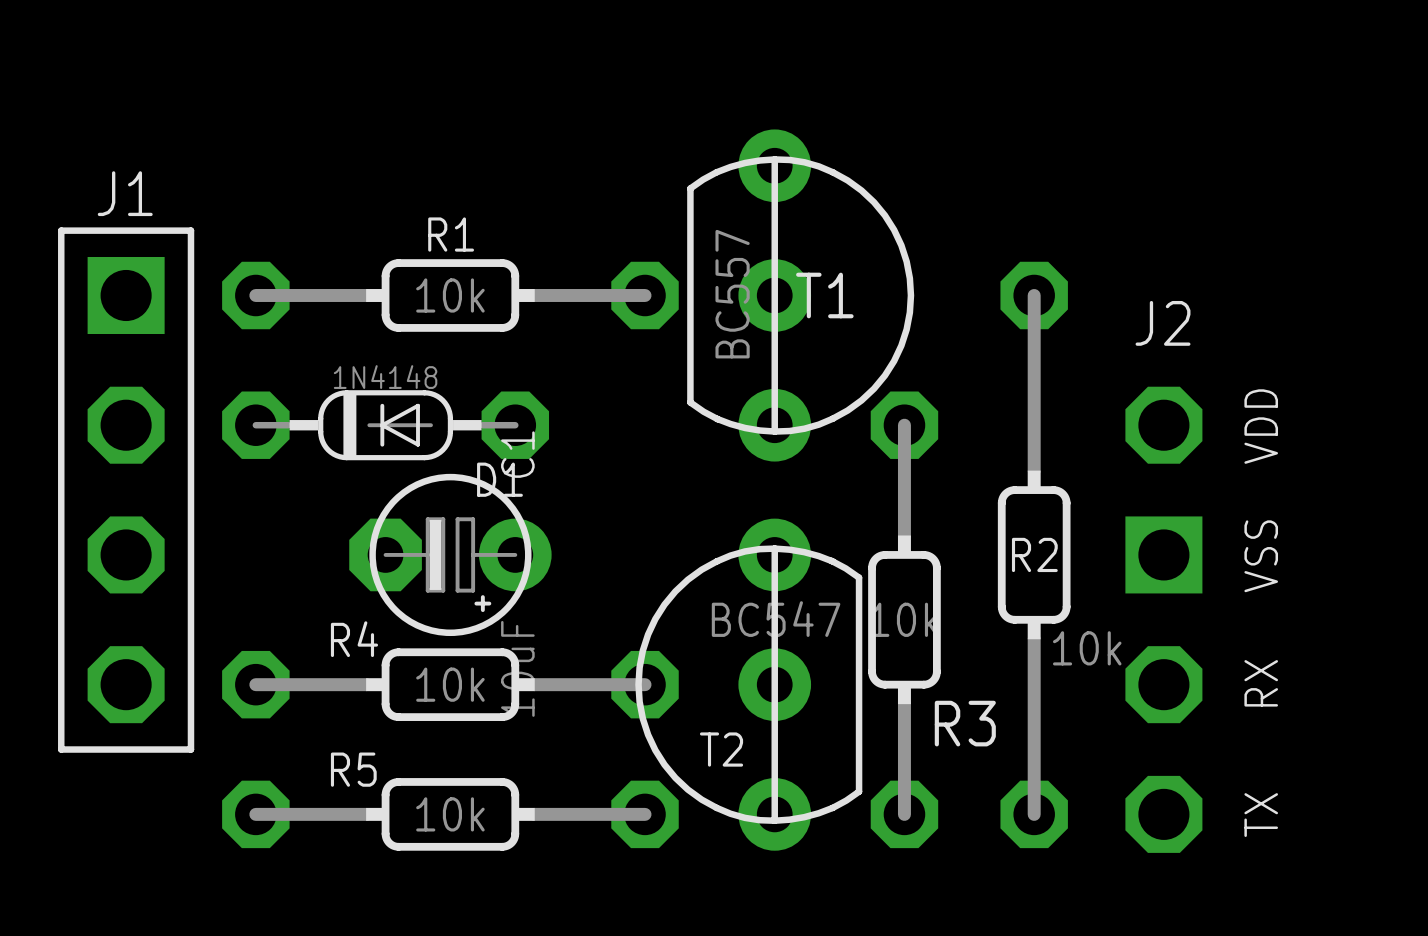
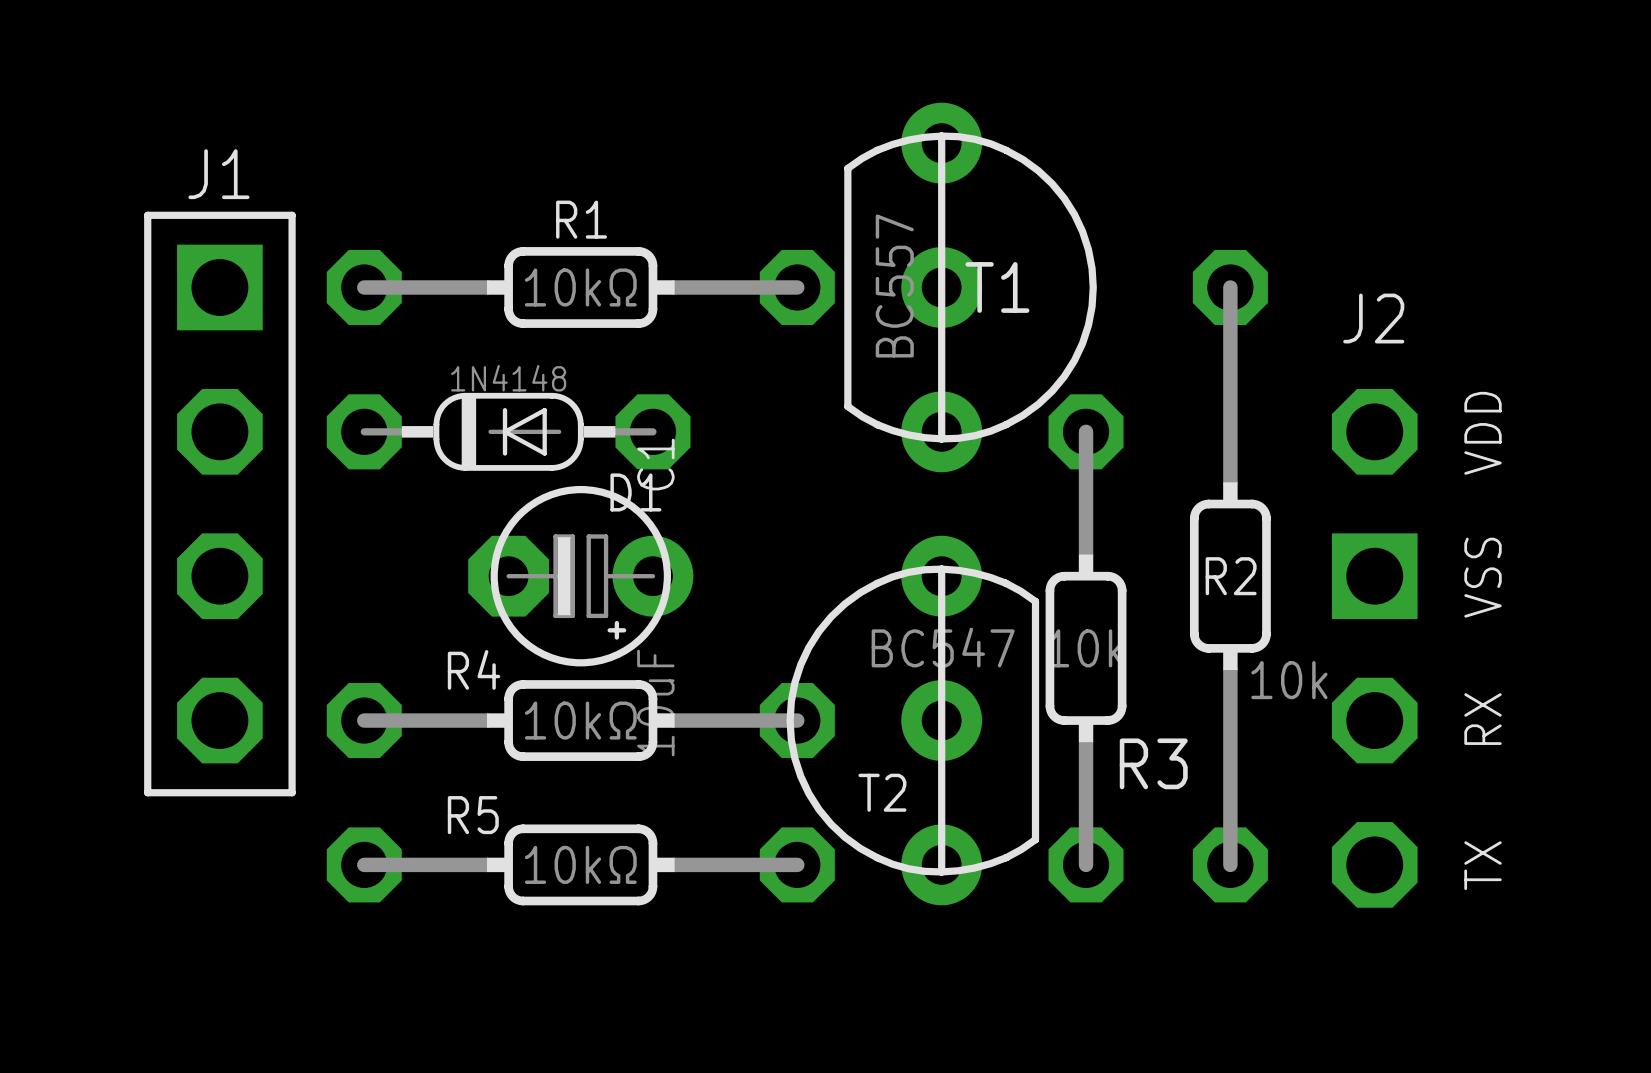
R1 value: 10k (450, 295) -> 10kΩ (580, 287)
R4 value: 10k (450, 684) -> 10kΩ (580, 720)
R5 value: 10k (450, 814) -> 10kΩ (580, 864)

